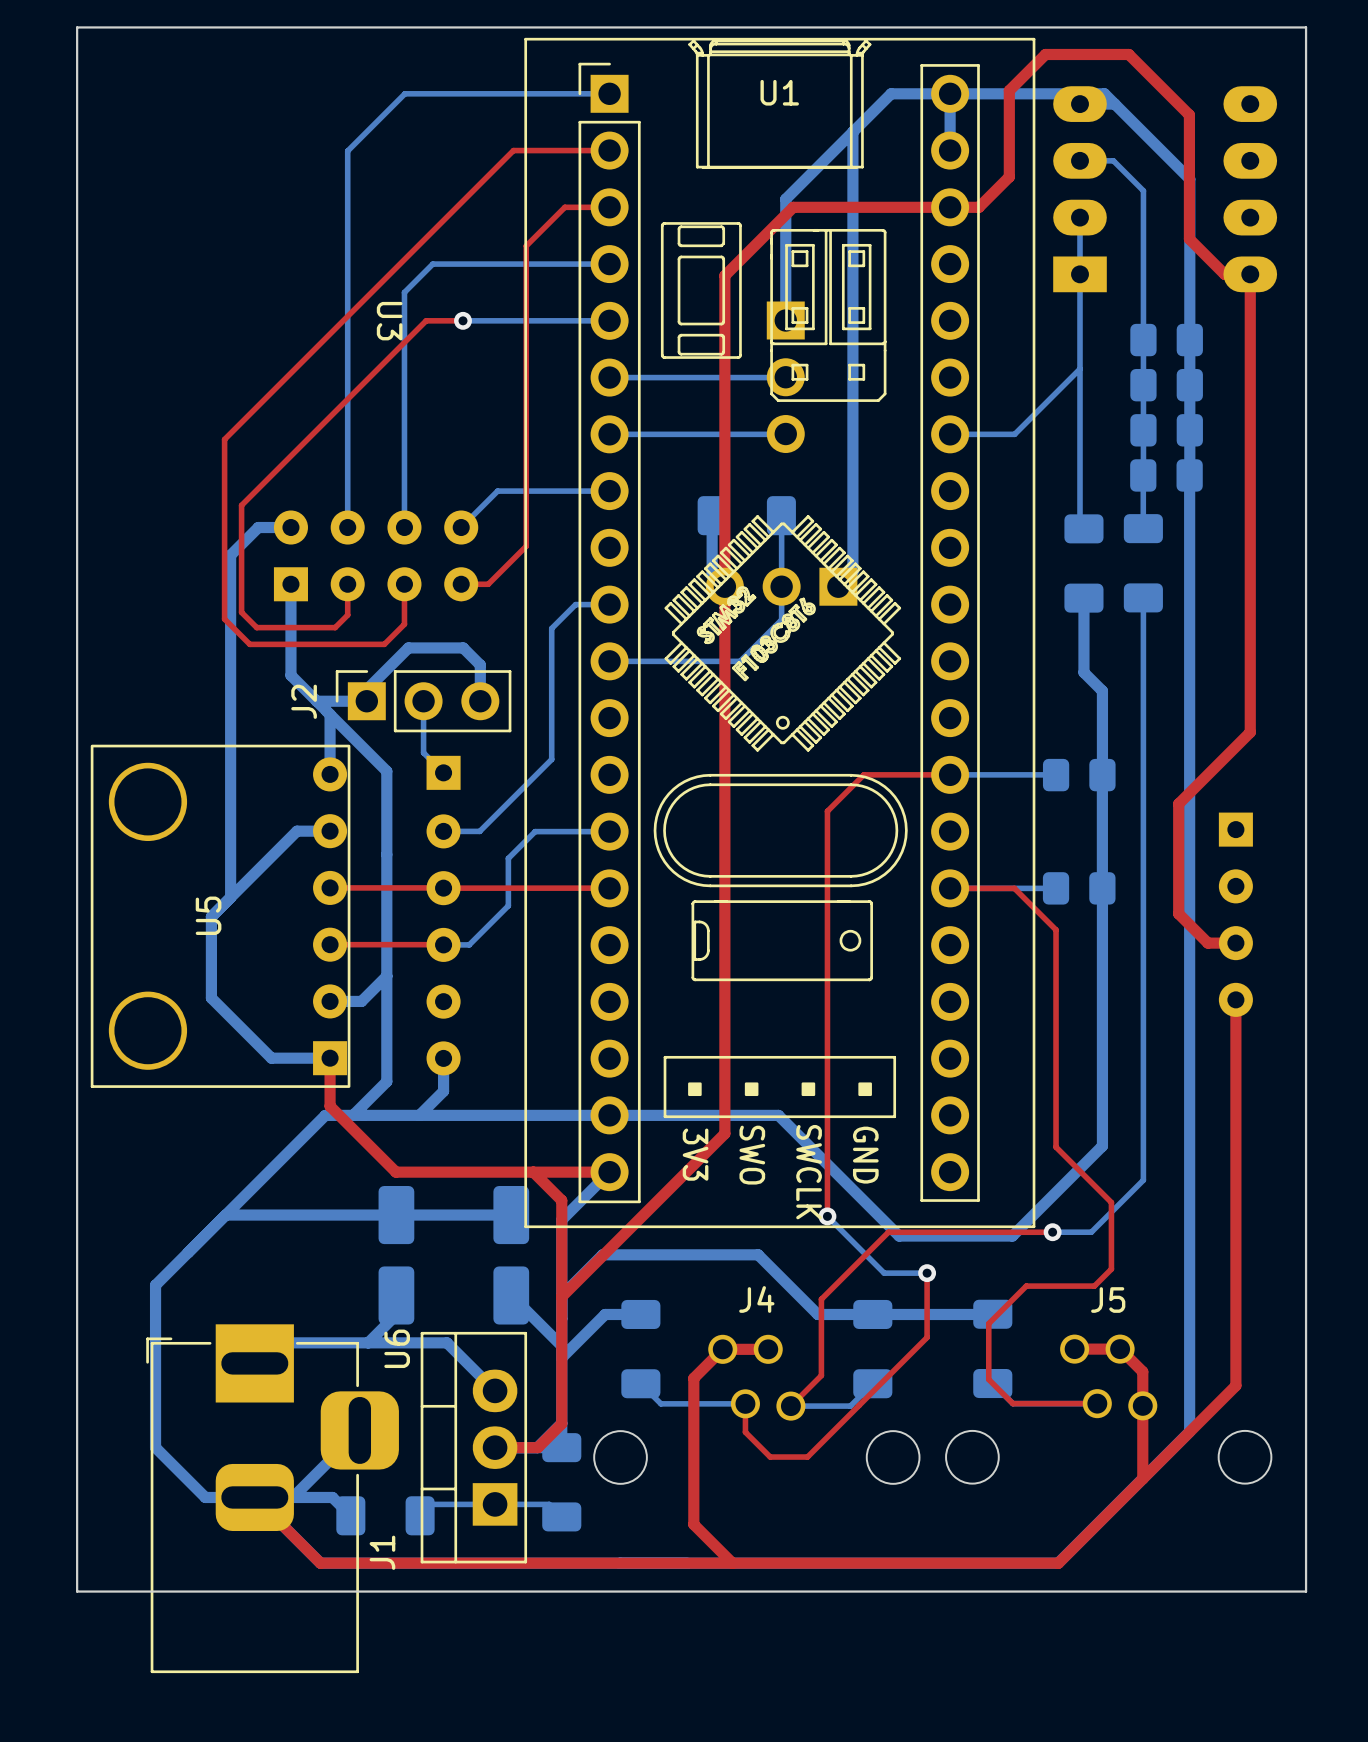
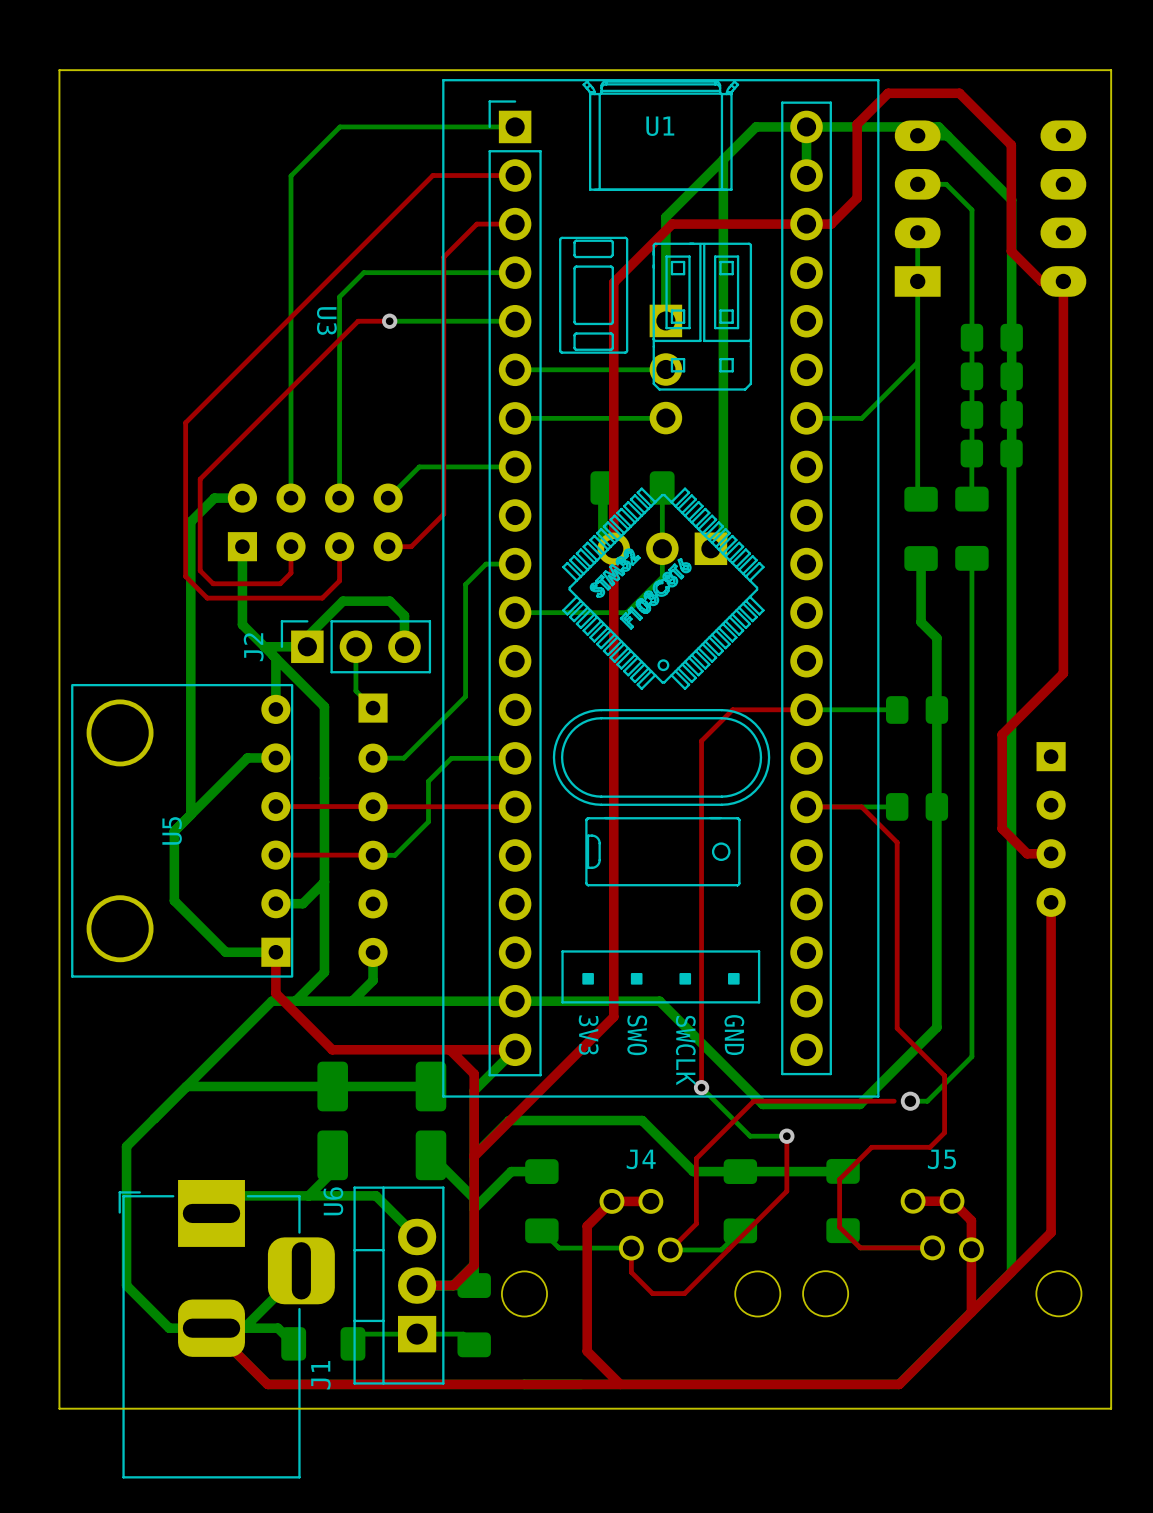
via position: (1052, 1232) -> (910, 1101)

